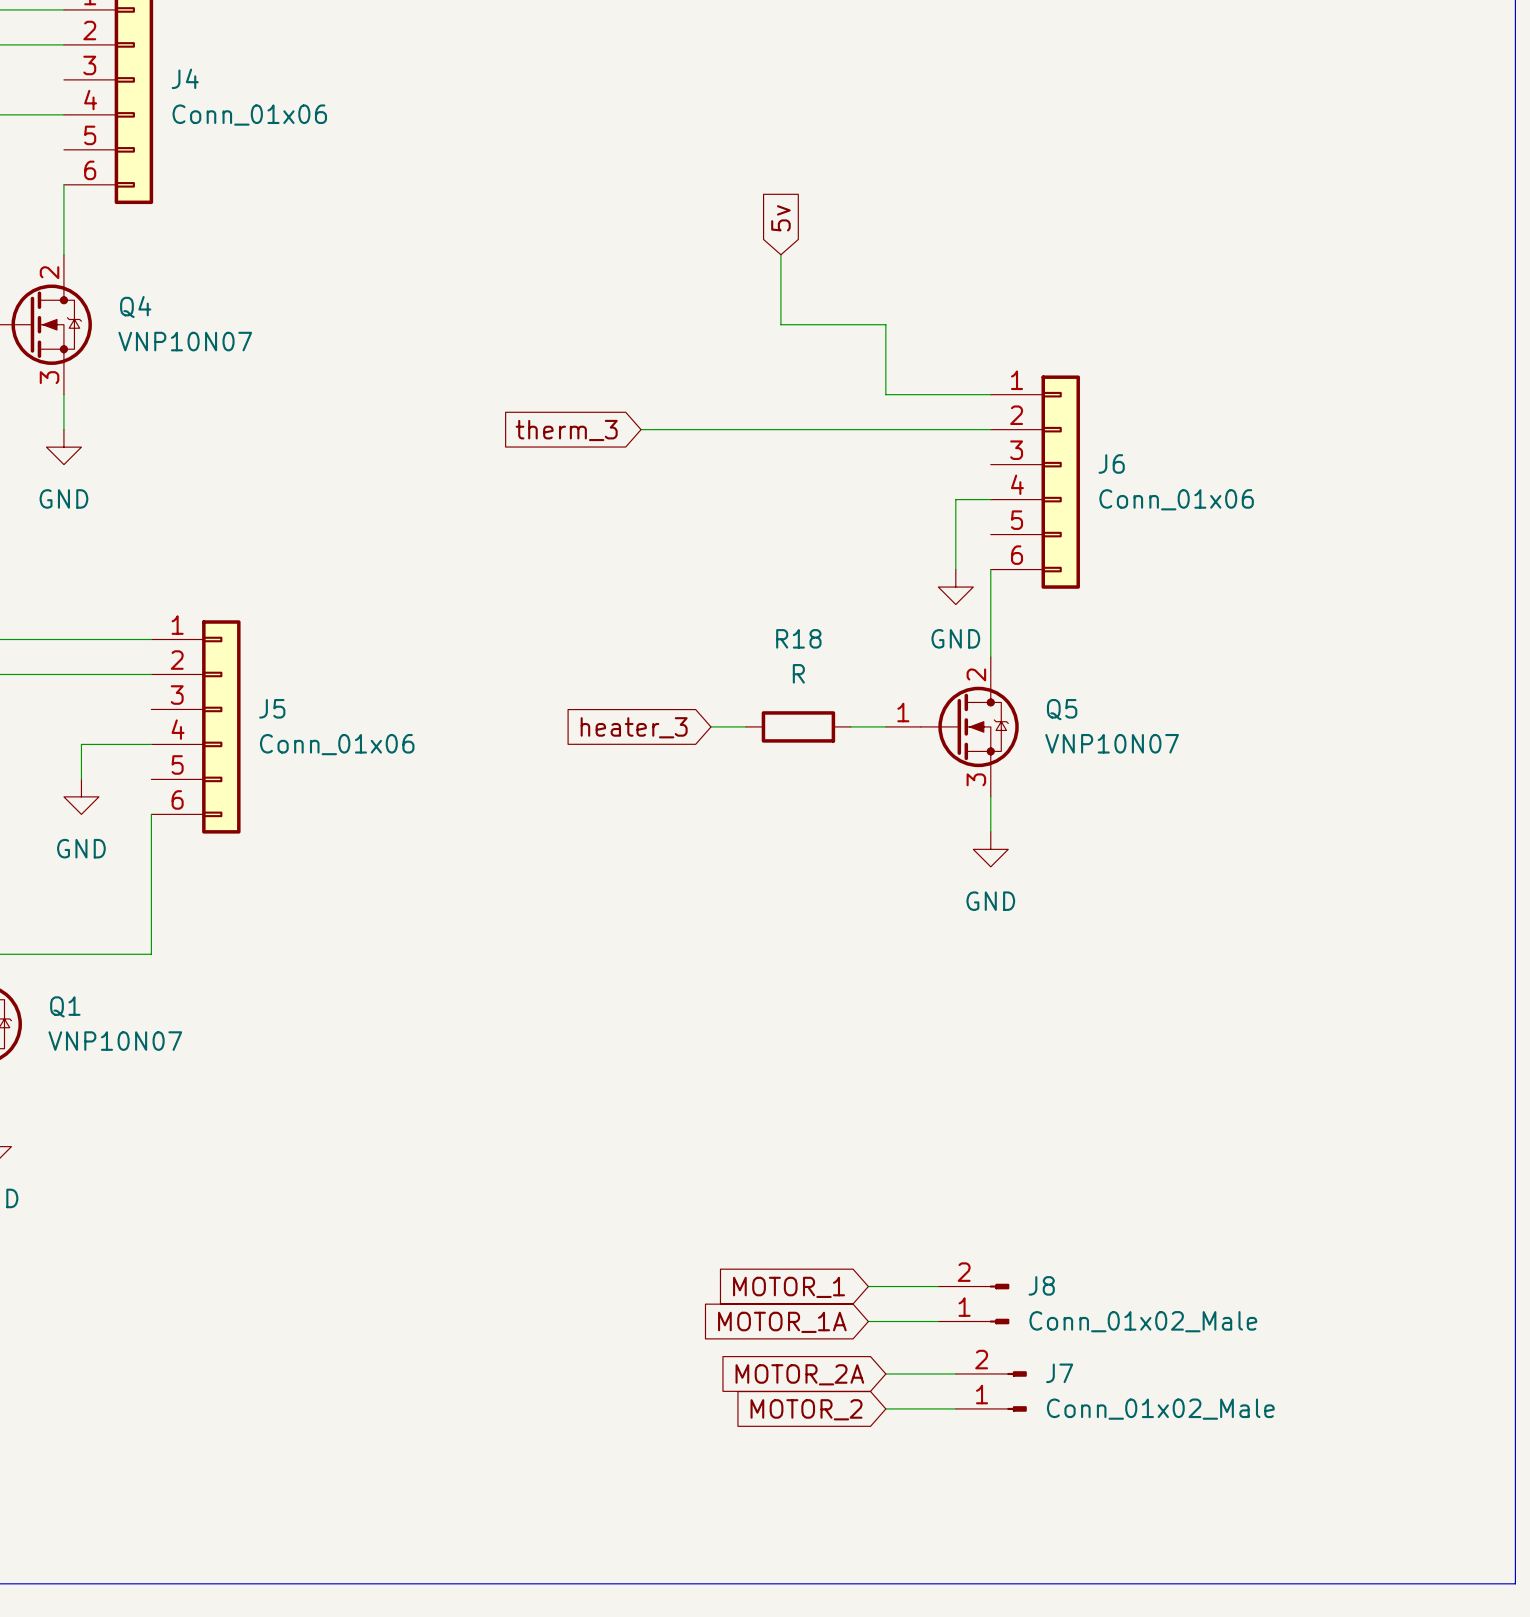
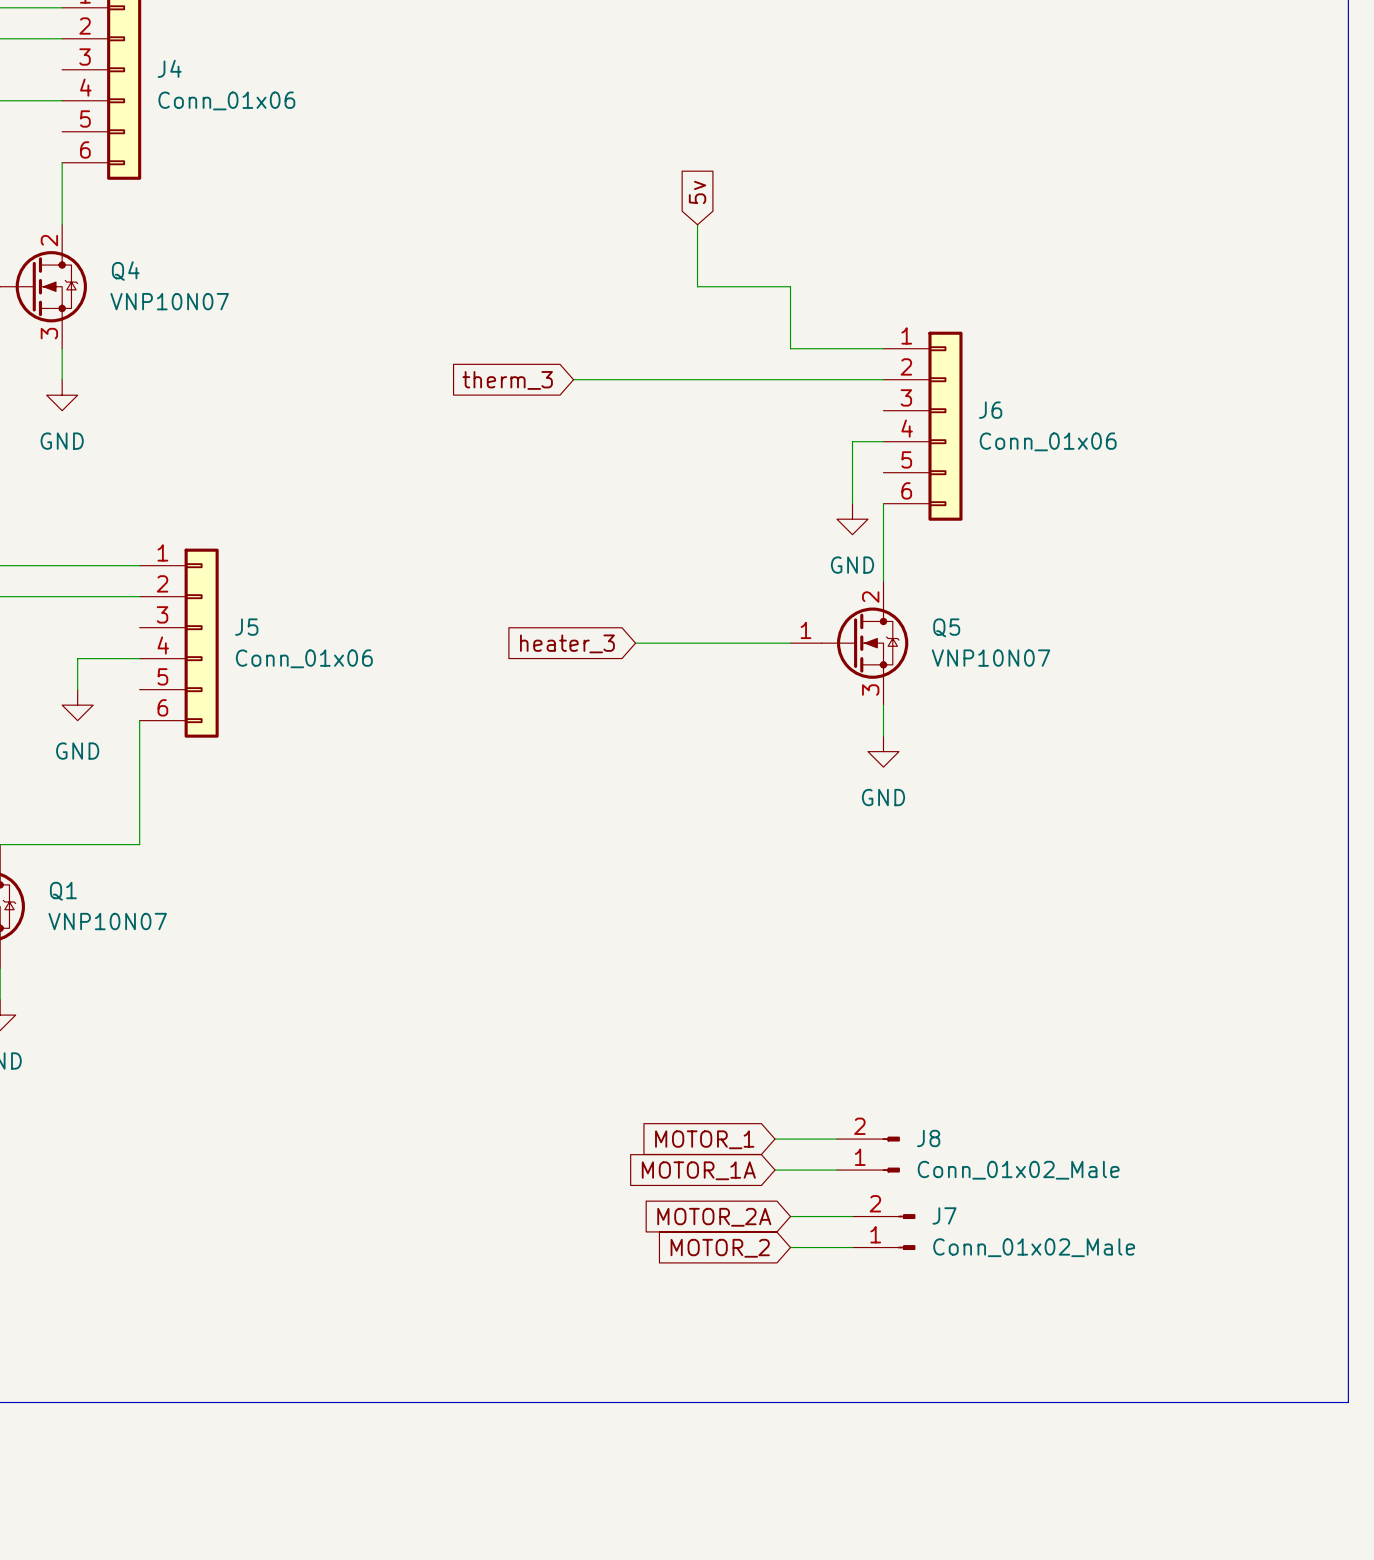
wire: none -> (666, 643) (759, 643)
R18: R (798, 726) -> none

